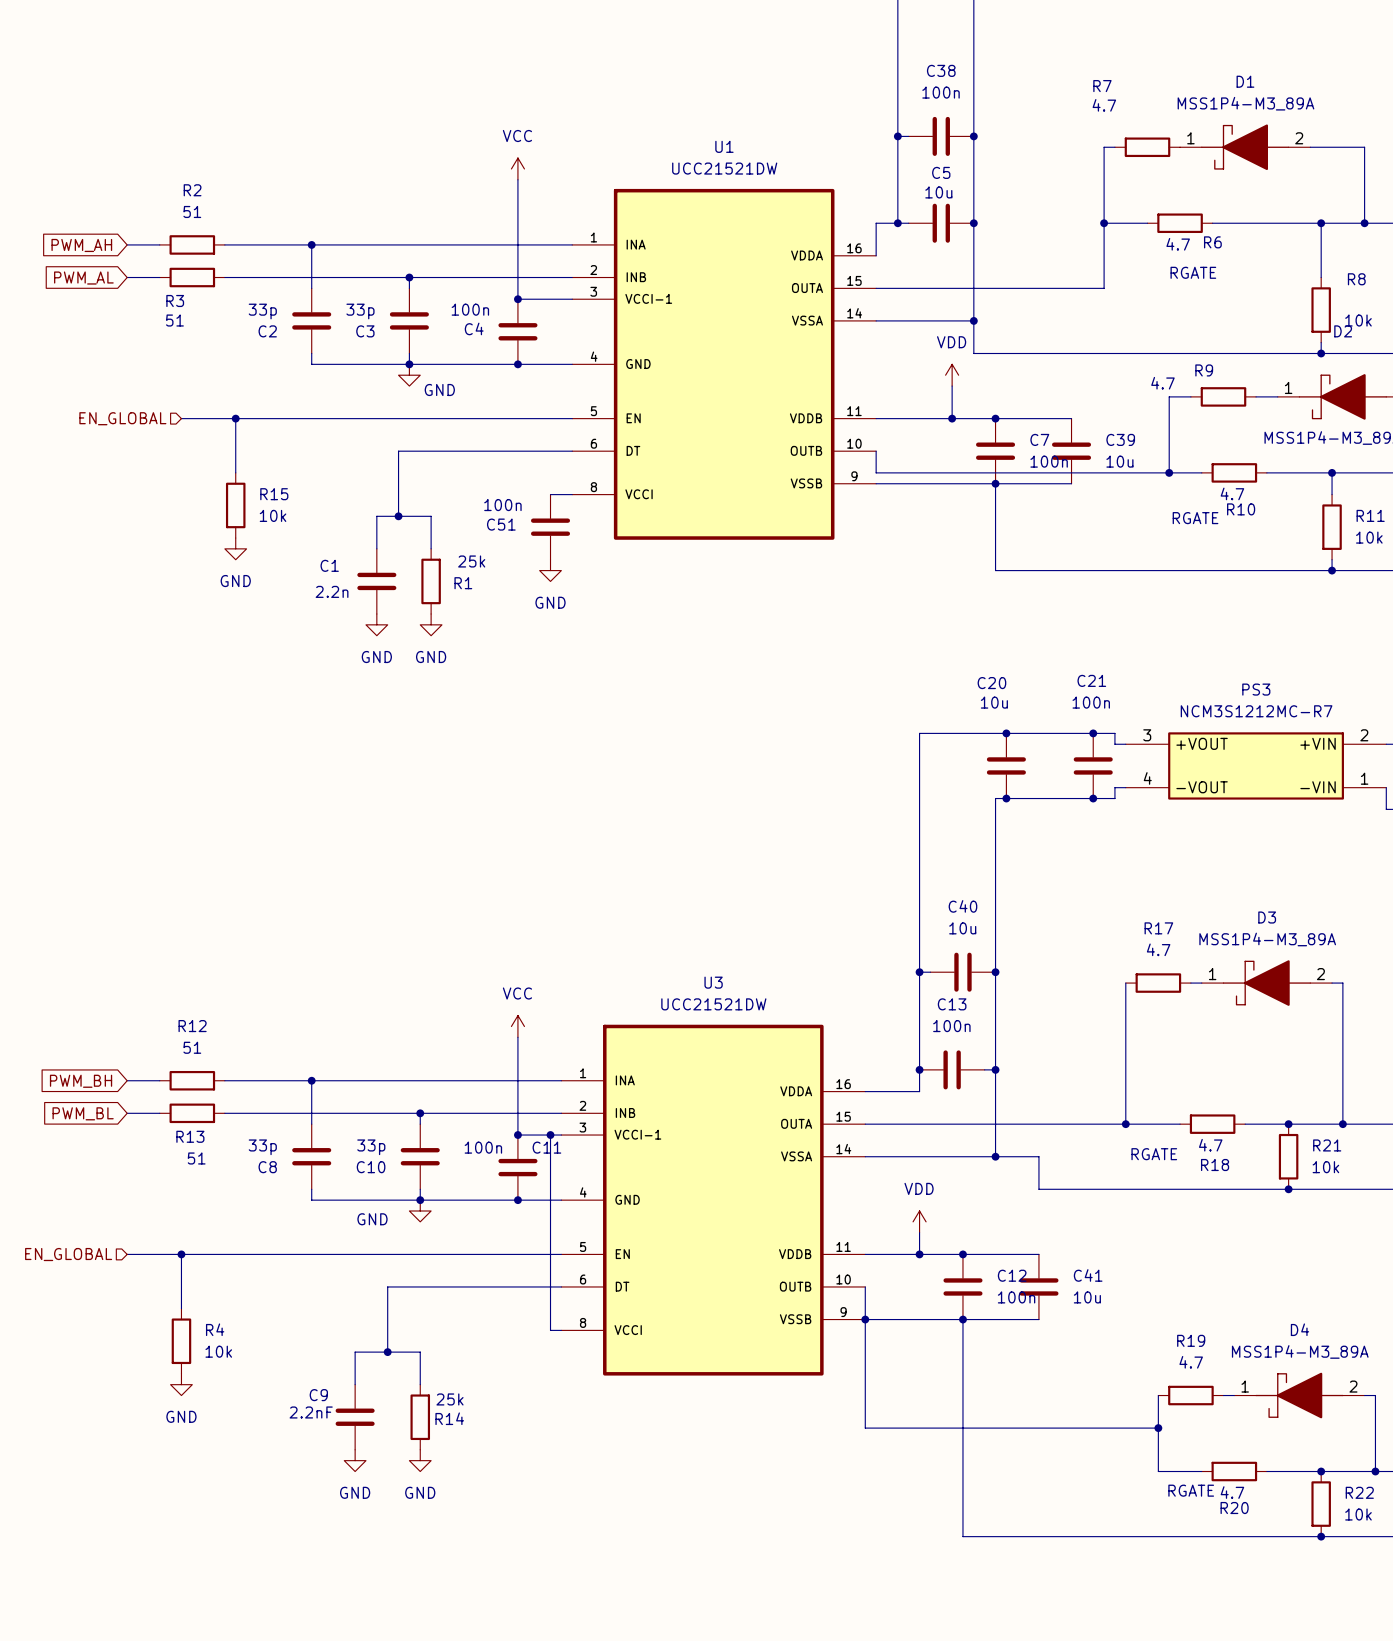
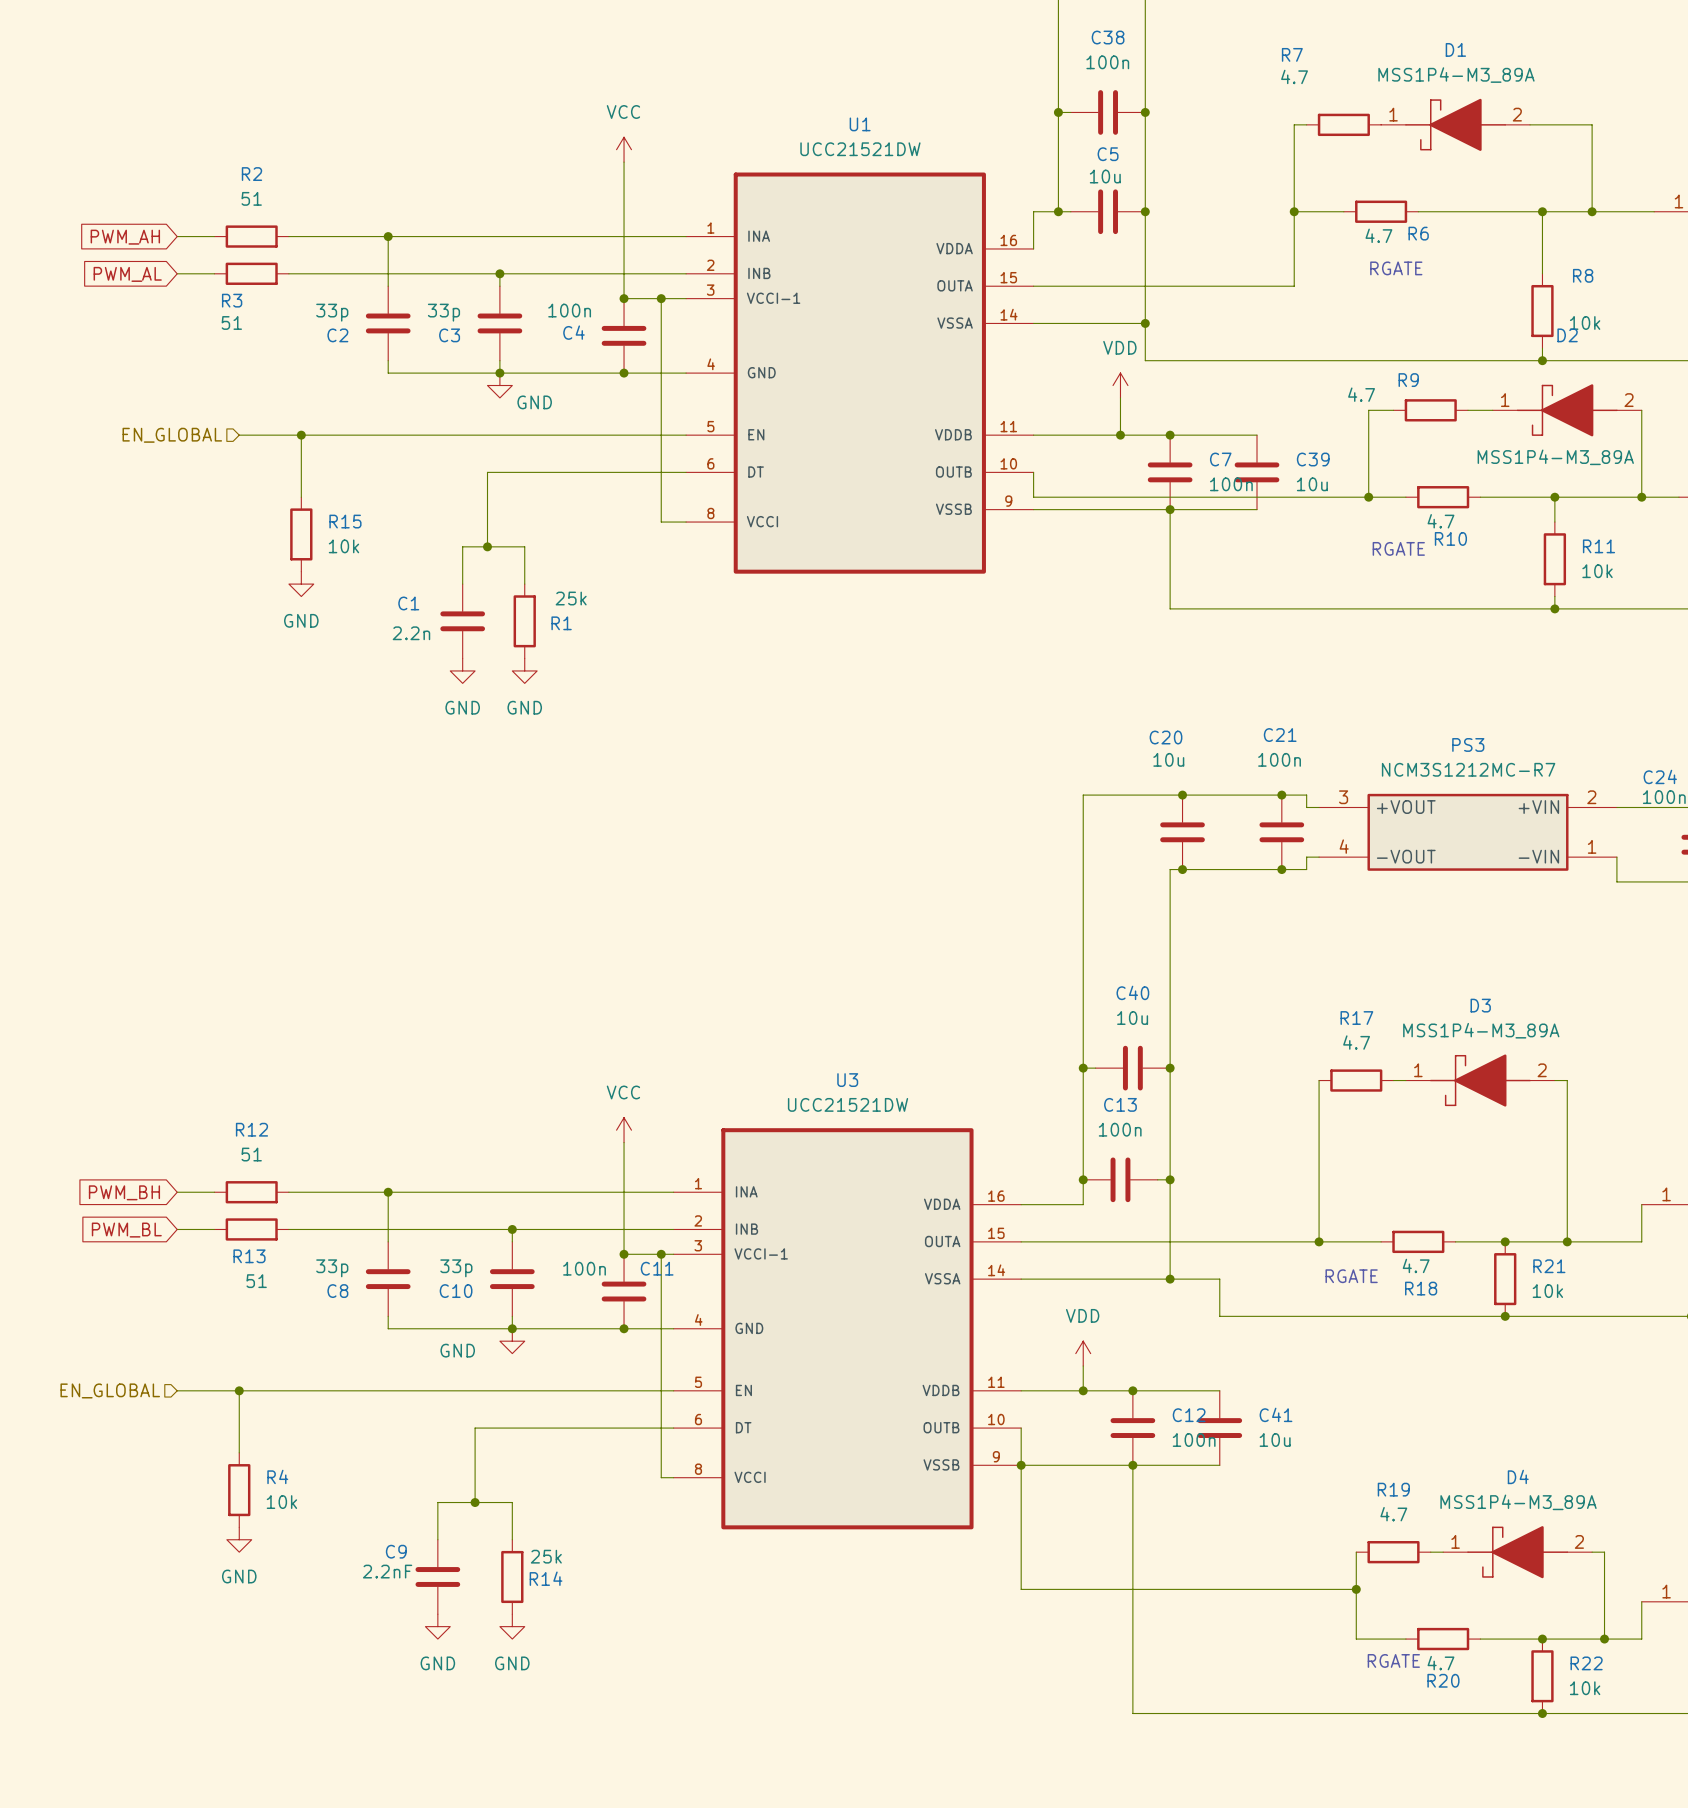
wire: none -> (661, 298) (661, 522)
junction: none -> (661, 298)
C51: 100n (550, 527) -> none
power symbol: GND (550, 570) -> none

